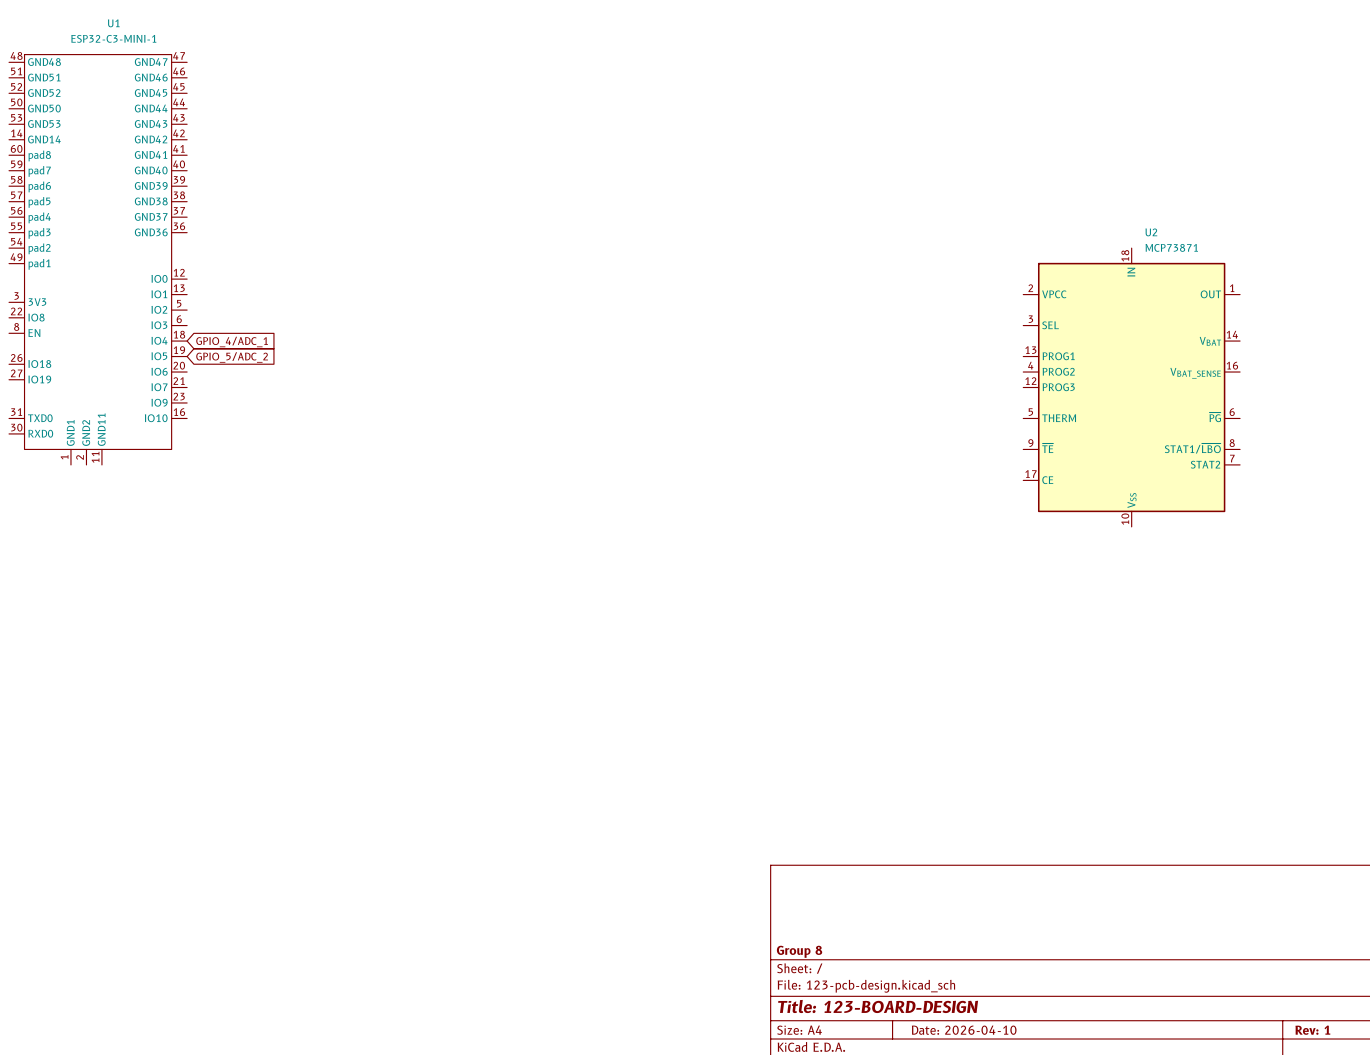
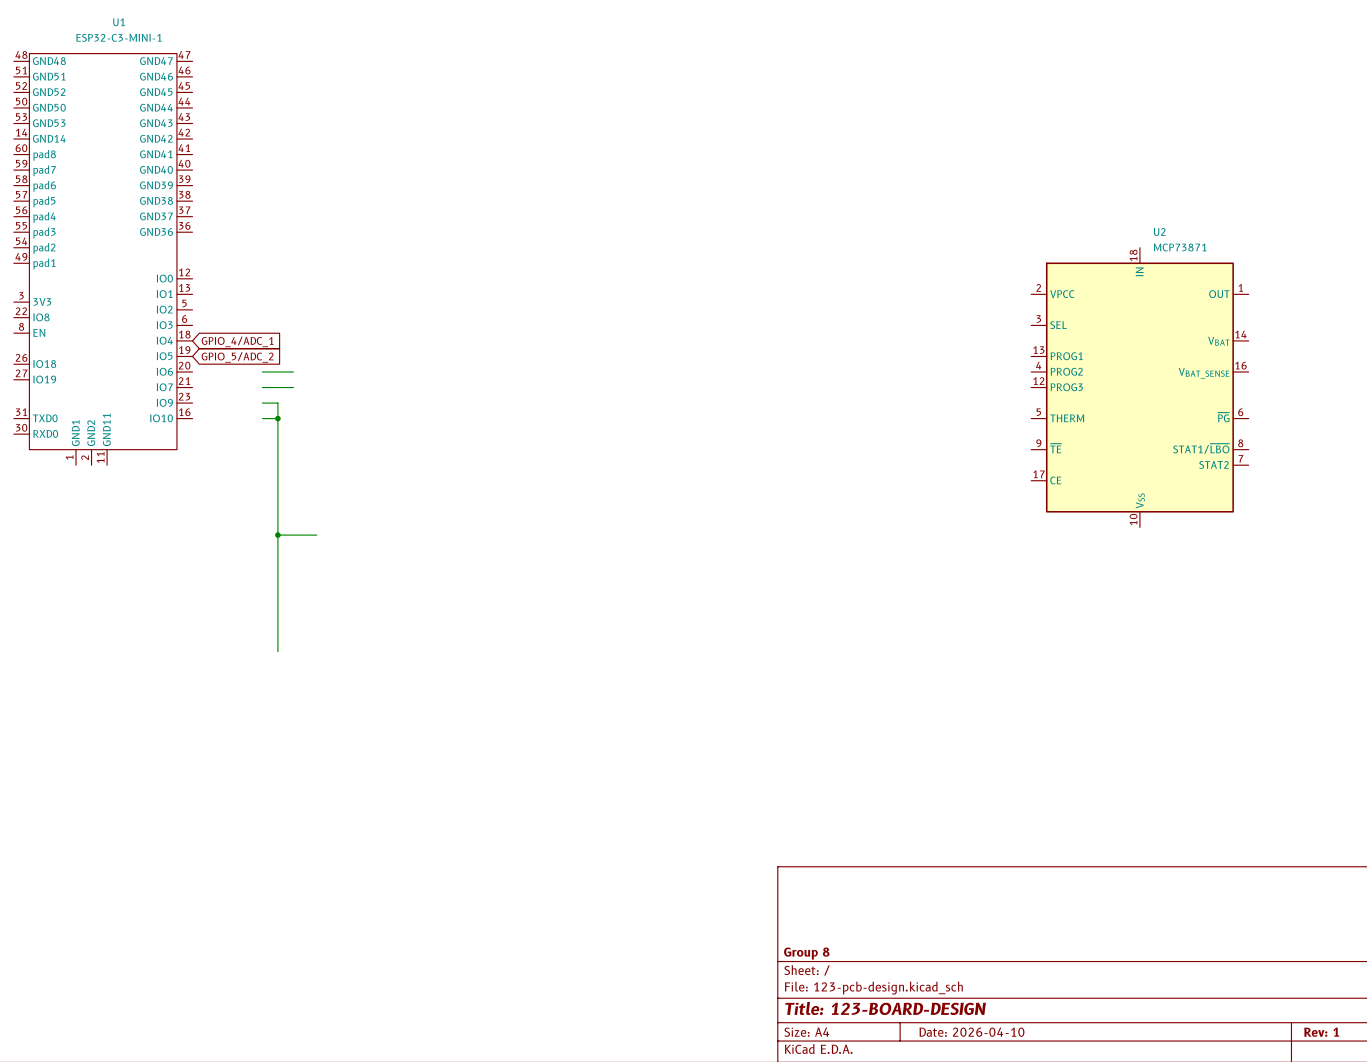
wire: none -> (262, 372) (293, 372)
wire: none -> (262, 387) (293, 387)
wire: none -> (262, 403) (277, 403) (277, 651)
wire: none -> (262, 418) (277, 418)
junction: none -> (277, 418)
wire: none -> (277, 535) (316, 535)
junction: none -> (277, 535)

